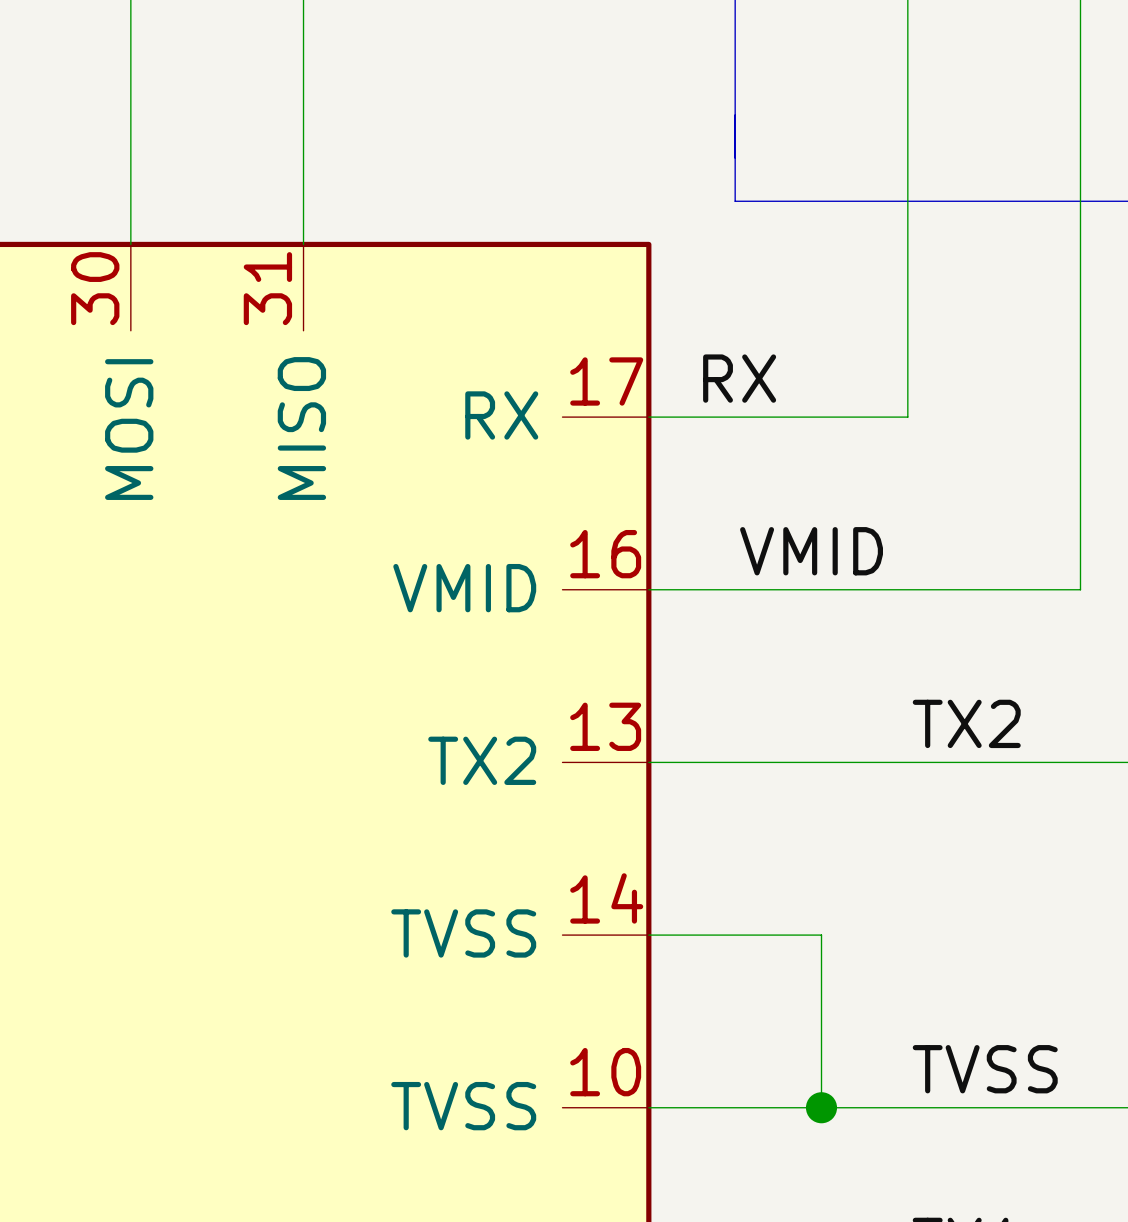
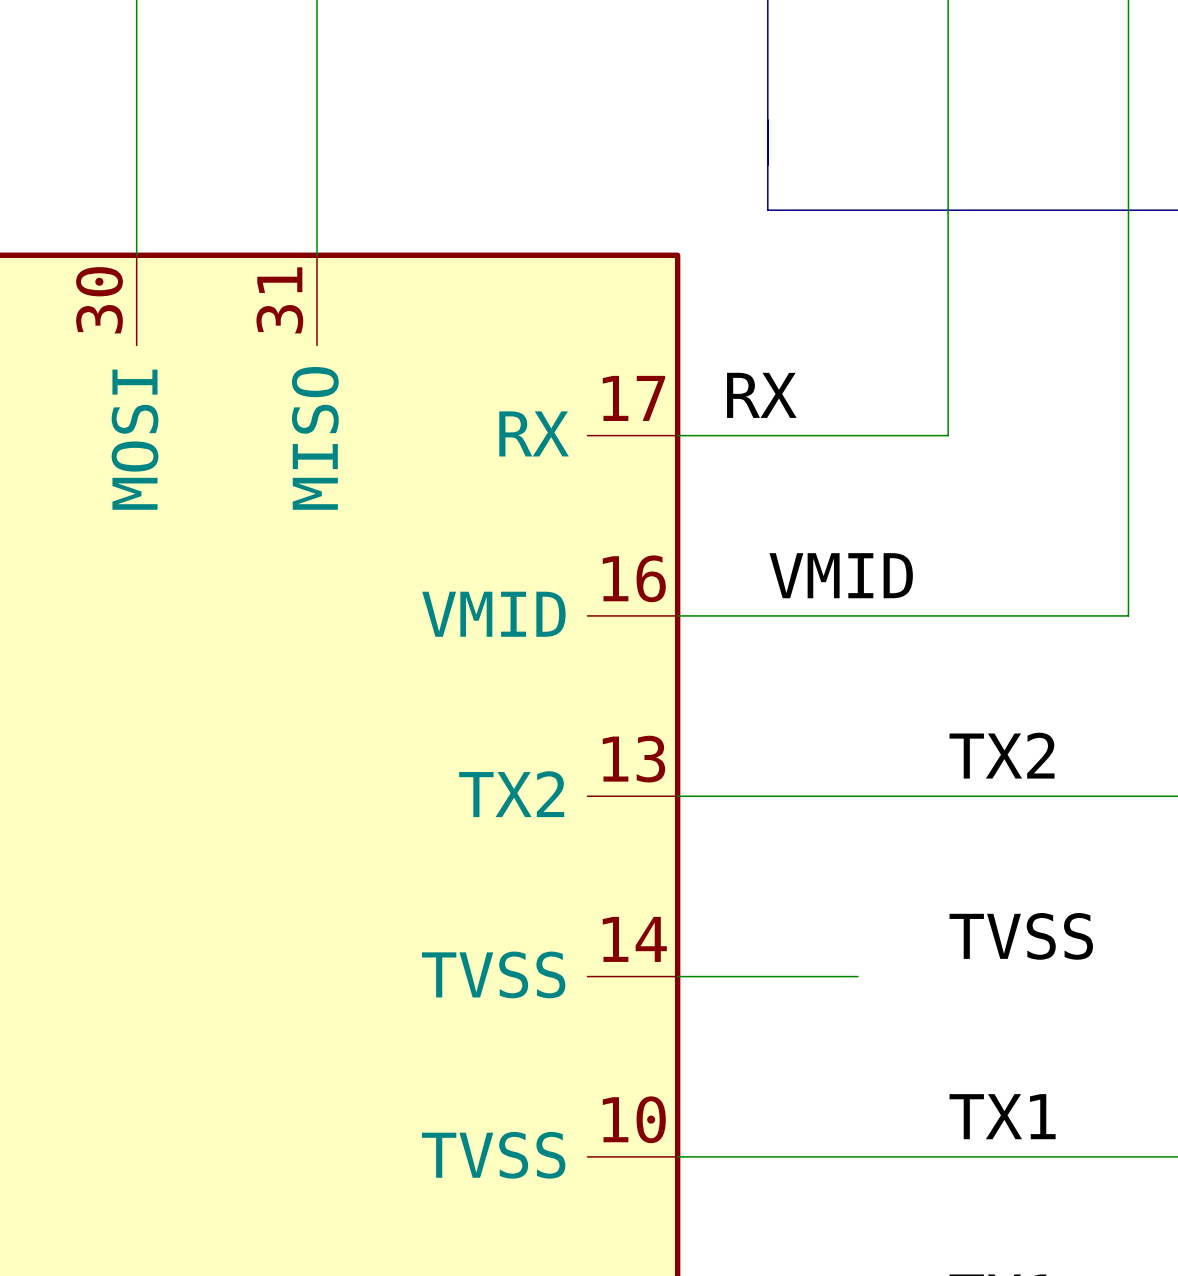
label: none -> TVSS (1021, 936)
wire: (821, 935) (821, 1107) -> none
label: TVSS (985, 1069) -> TX1 (1002, 1116)
junction: (821, 1107) -> none

